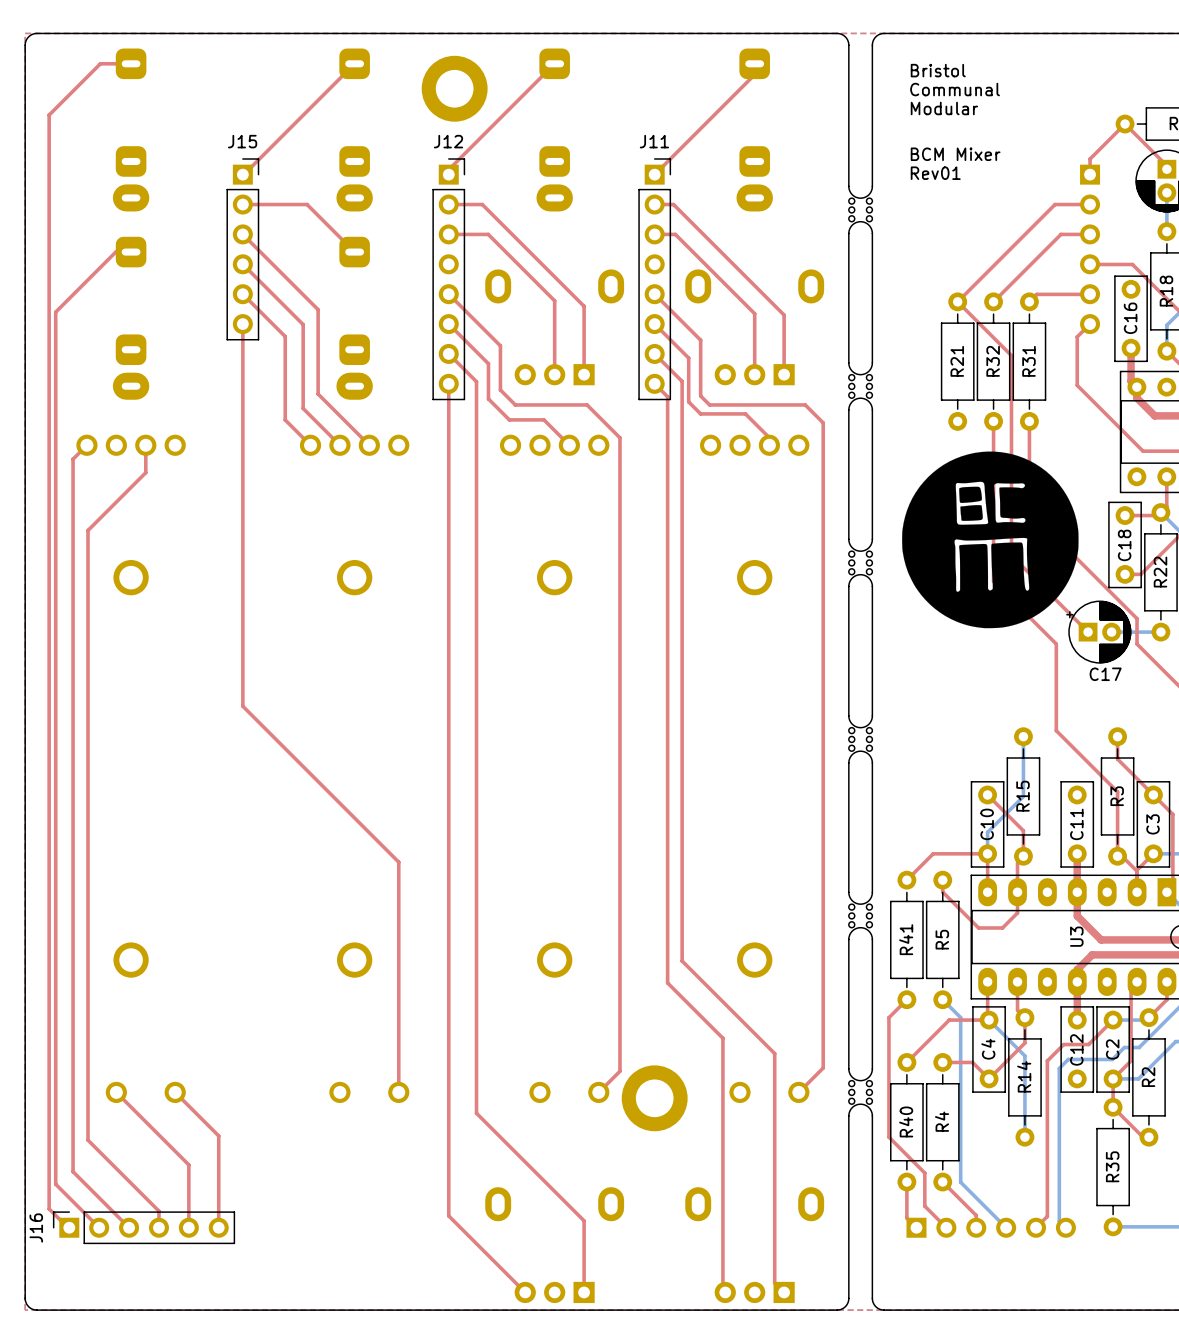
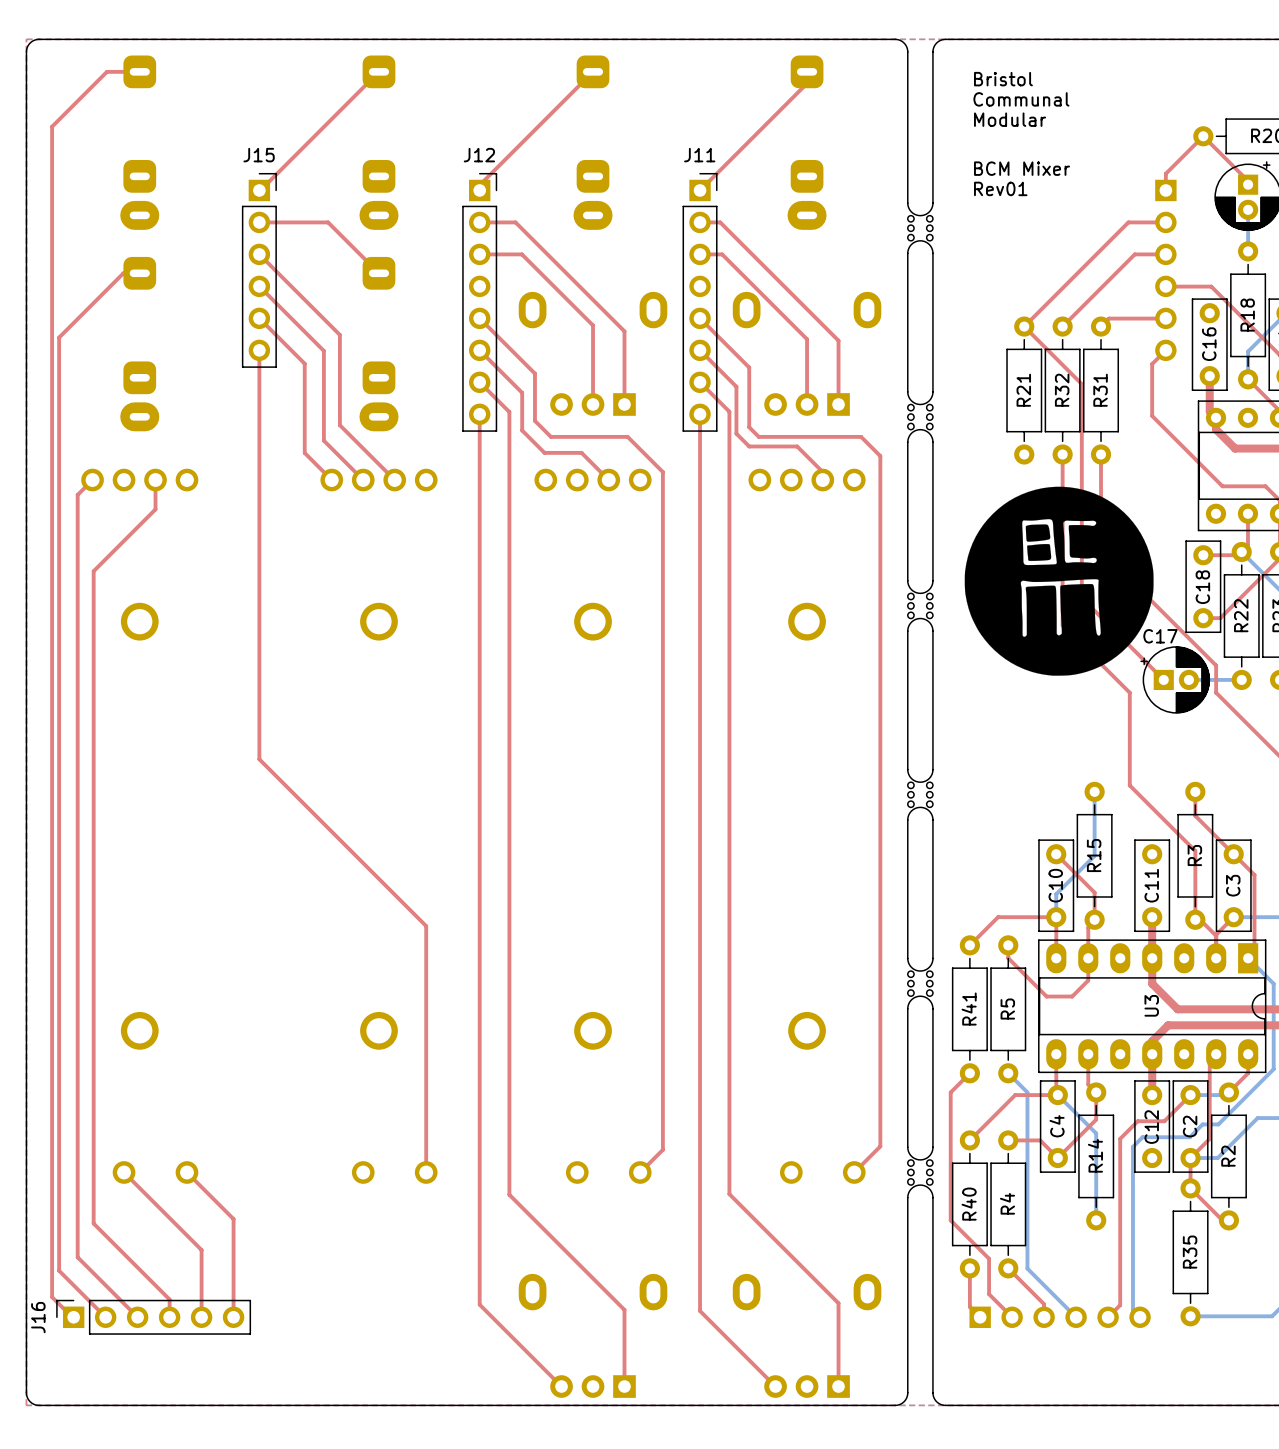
part: (454, 88) -> none
top track: (654, 383) (667, 396) (667, 983) (722, 1038) (722, 1290) -> (700, 414) (700, 1310) (773, 1384)
C17 name position: C17 (1105, 674) -> C17 (1160, 636)
top track: (682, 961) (774, 1053) (774, 1283) (784, 1292) -> (729, 1031) (729, 1194) (838, 1303) (838, 1386)
part: (654, 1098) -> none

